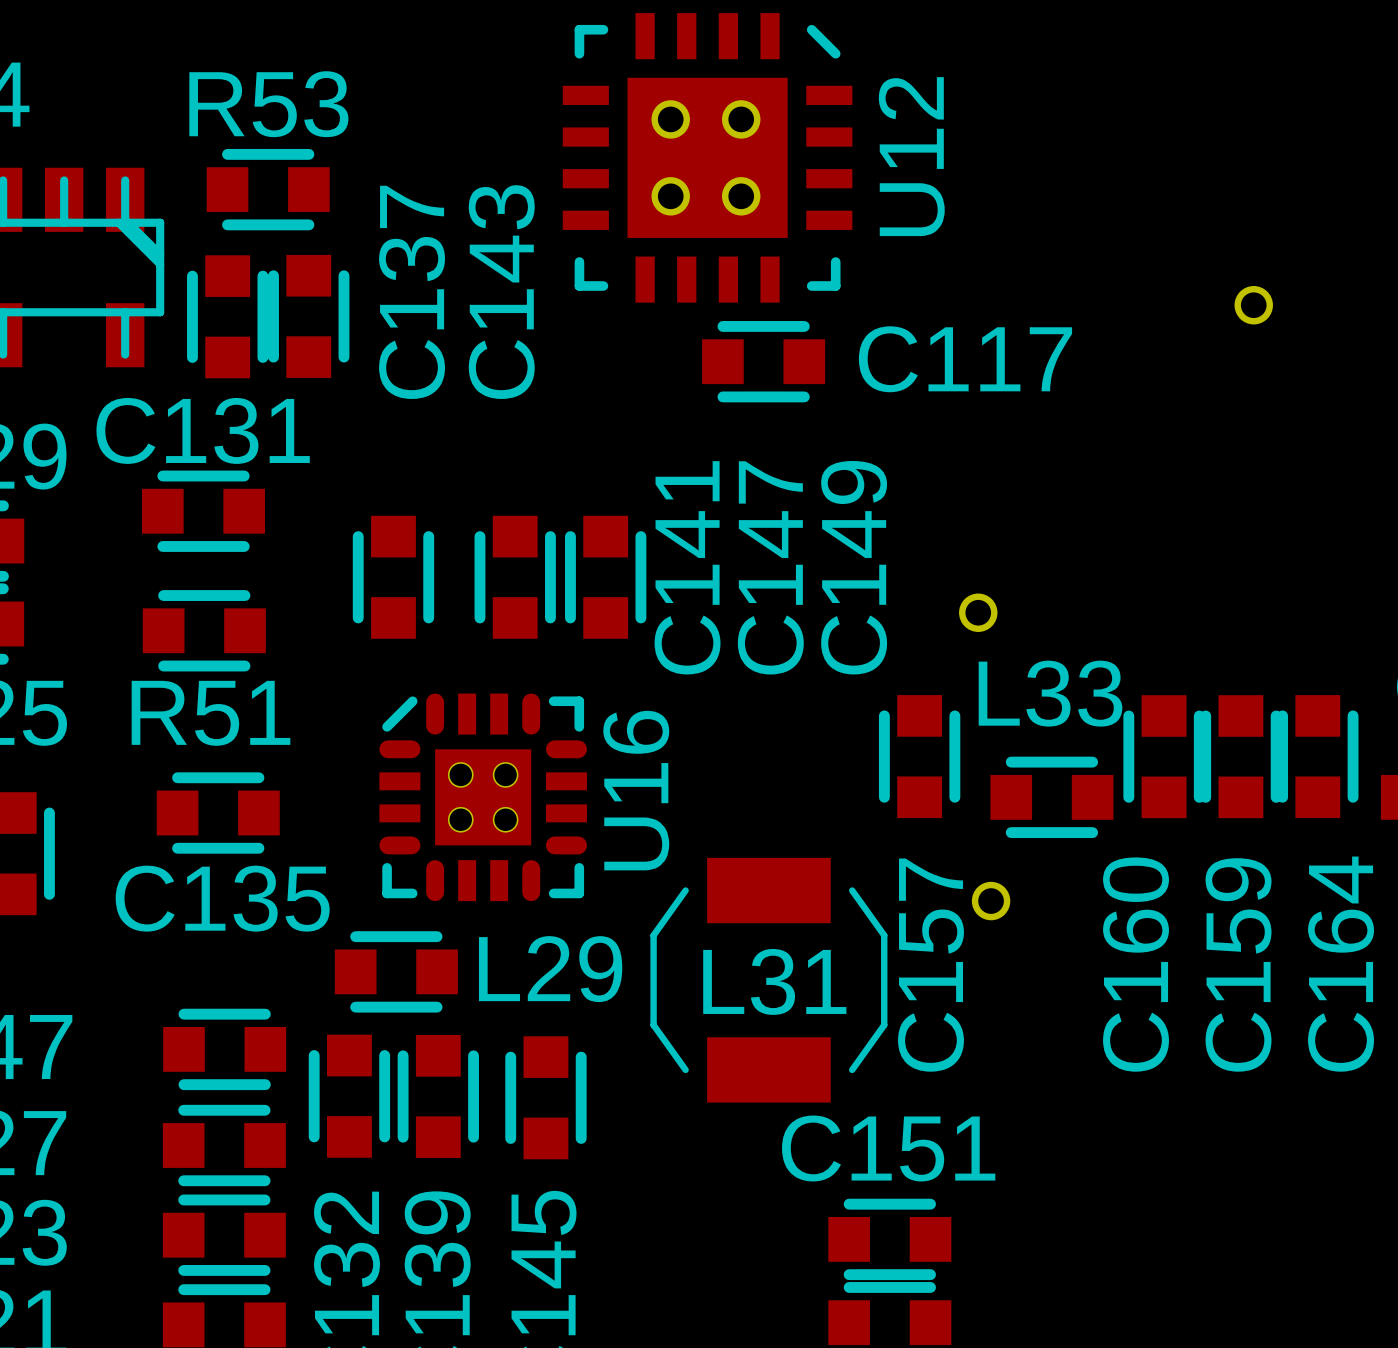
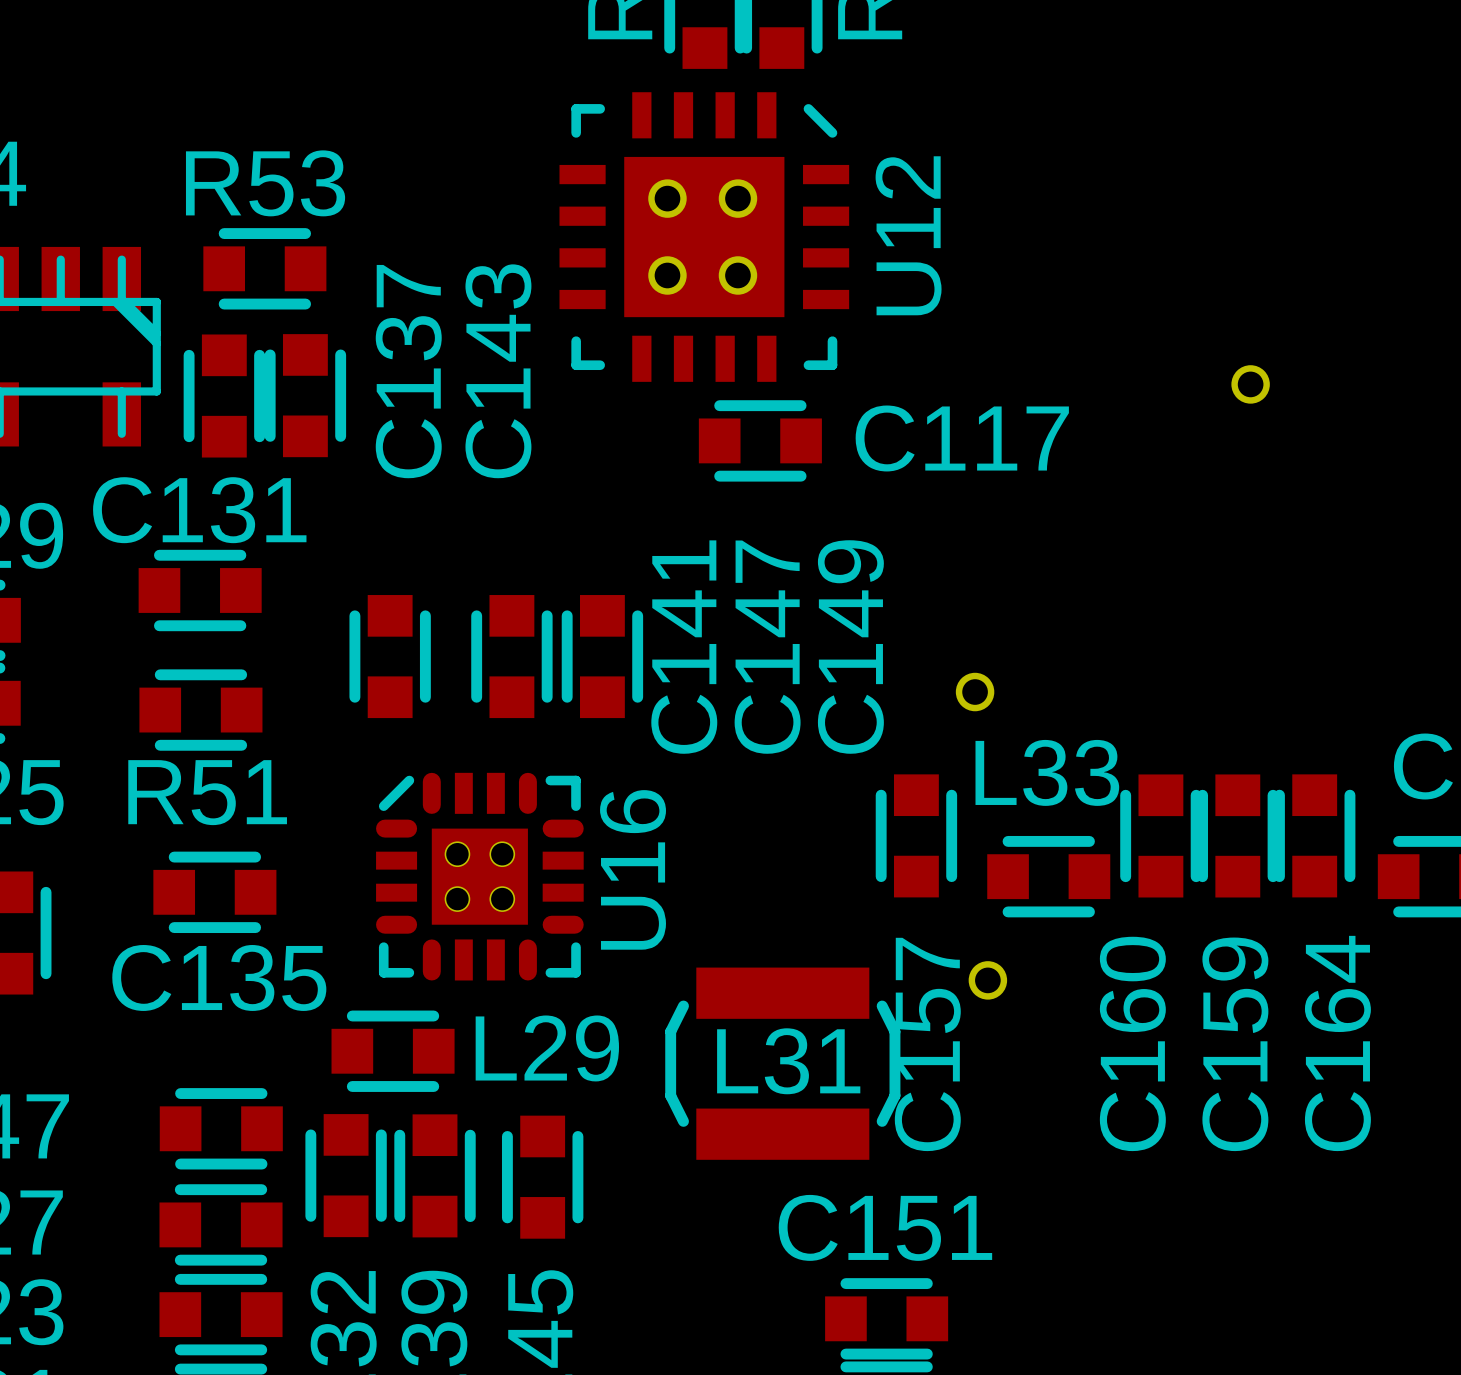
L31 footprint: [650, 857, 888, 1103] -> [665, 967, 901, 1160]
L31 name position: L31 (774, 981) -> L31 (788, 1061)

